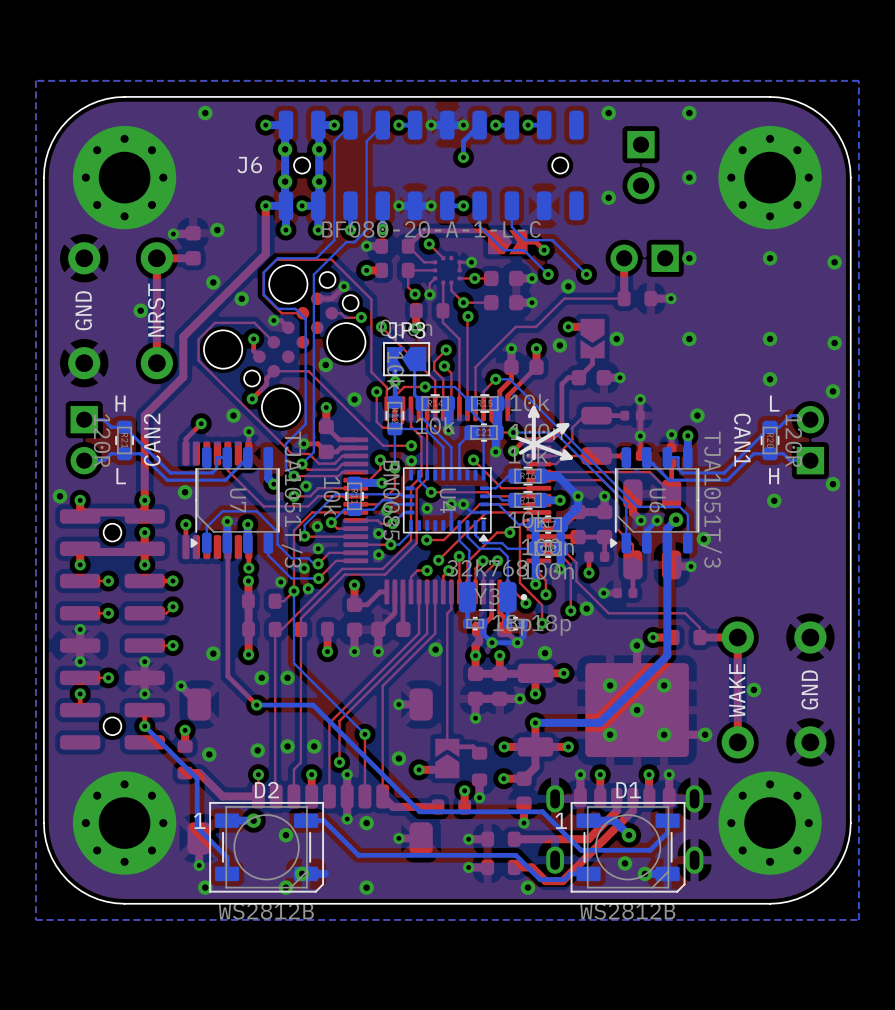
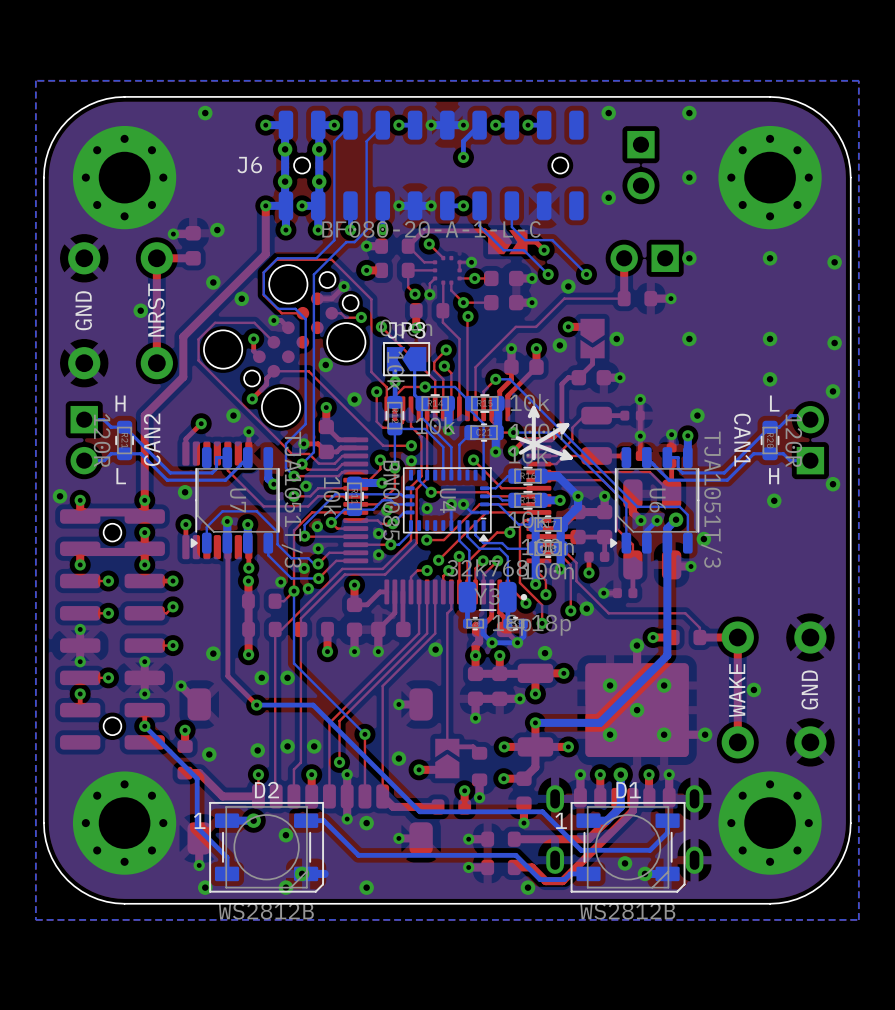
bottom track: (607, 820) (614, 820) (628, 835) -> (607, 820) (620, 806) (620, 774)
via position: (628, 835) -> (620, 774)

